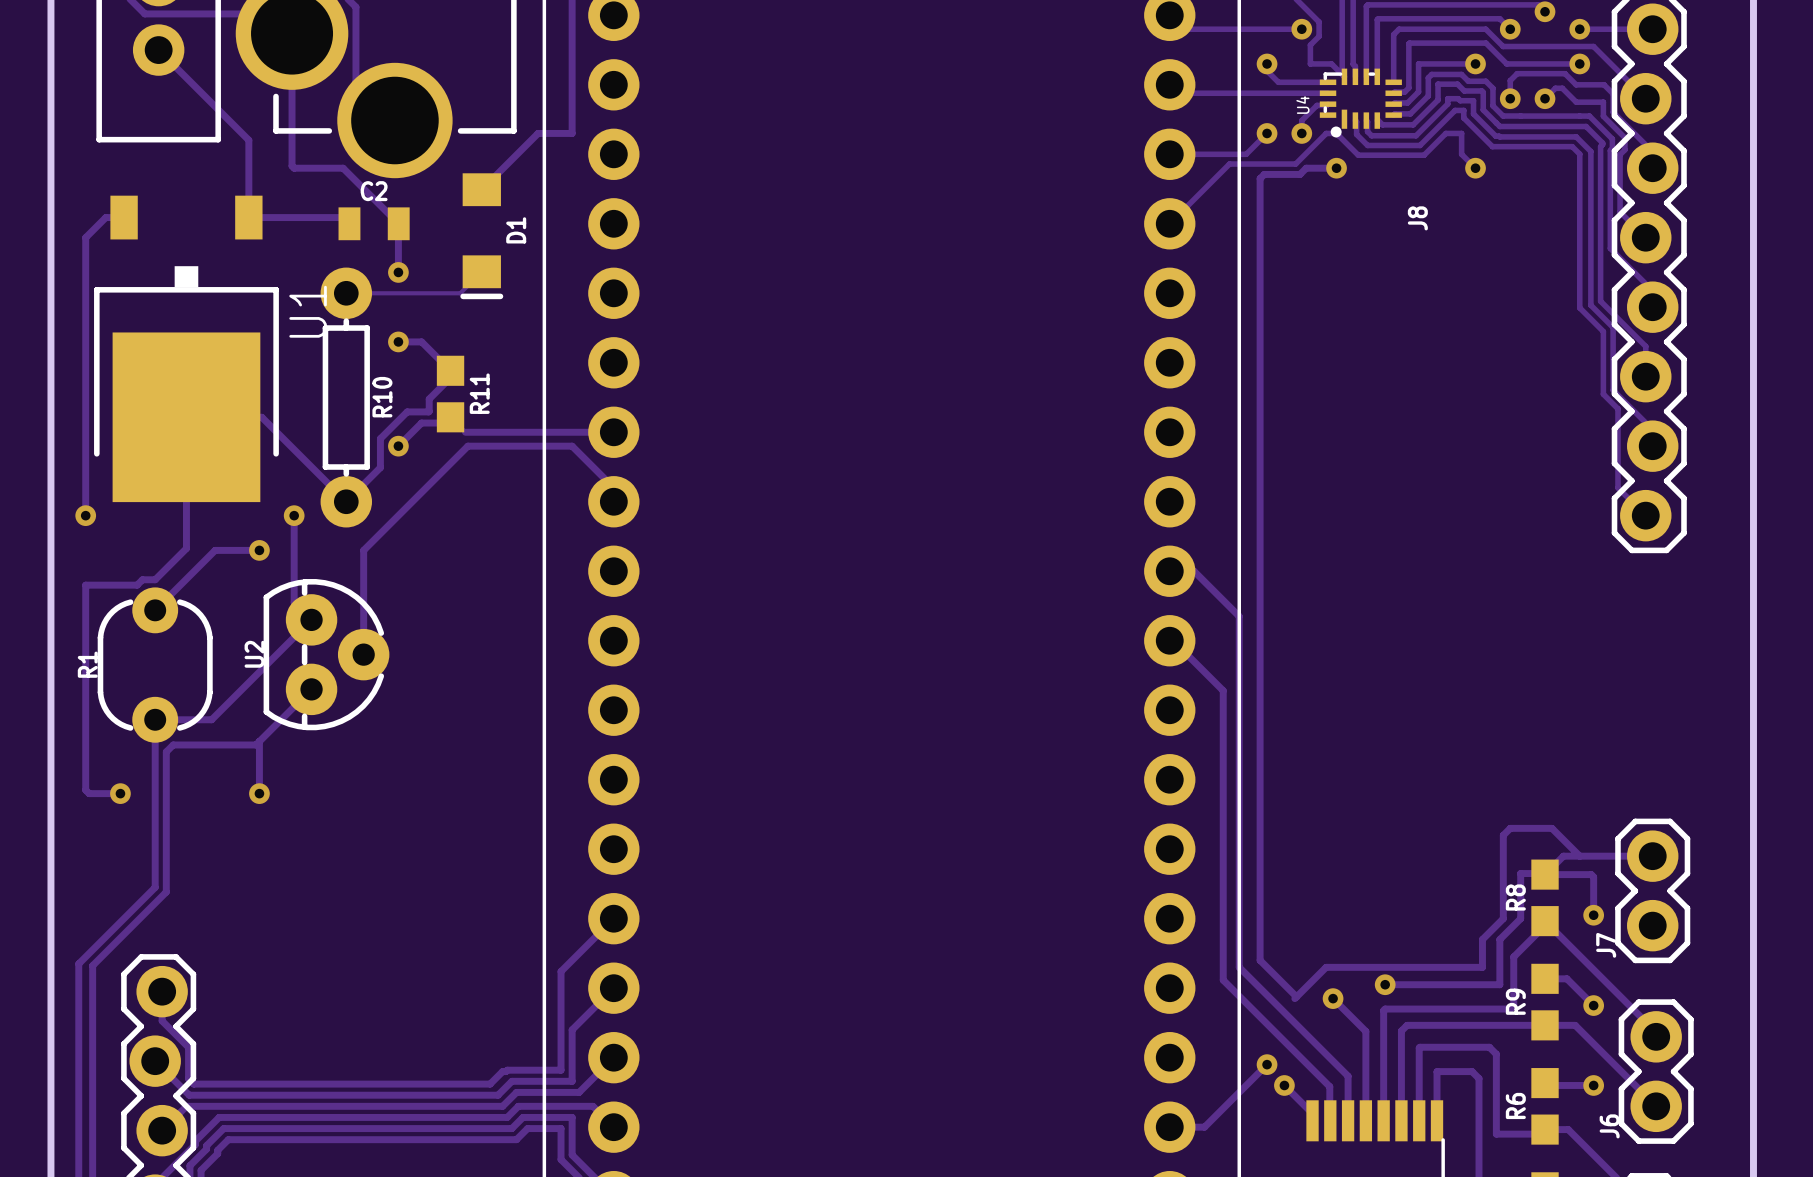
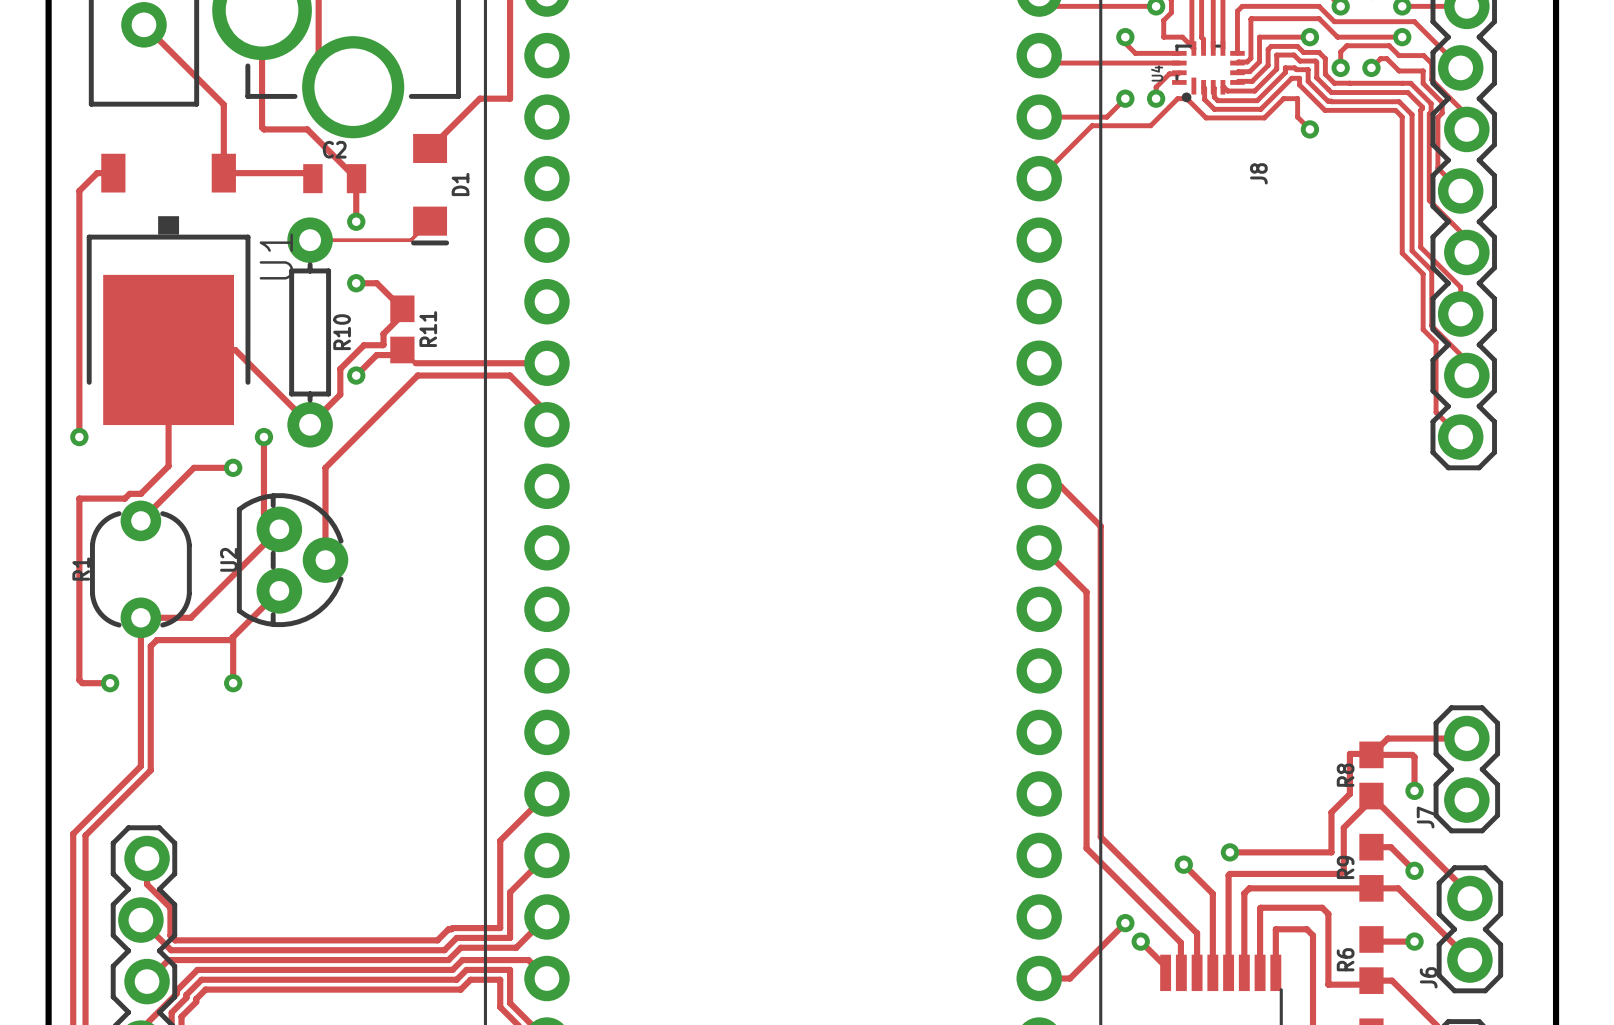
track: (1336, 168) (1306, 168) (1300, 174) (1264, 174) (1260, 178) (1260, 960) (1296, 996) -> none
via: (1336, 168) -> none
track: (1579, 856) (1551, 828) (1510, 828) (1503, 835) (1503, 918) (1482, 939) (1482, 967) (1326, 967) (1294, 998) -> none

